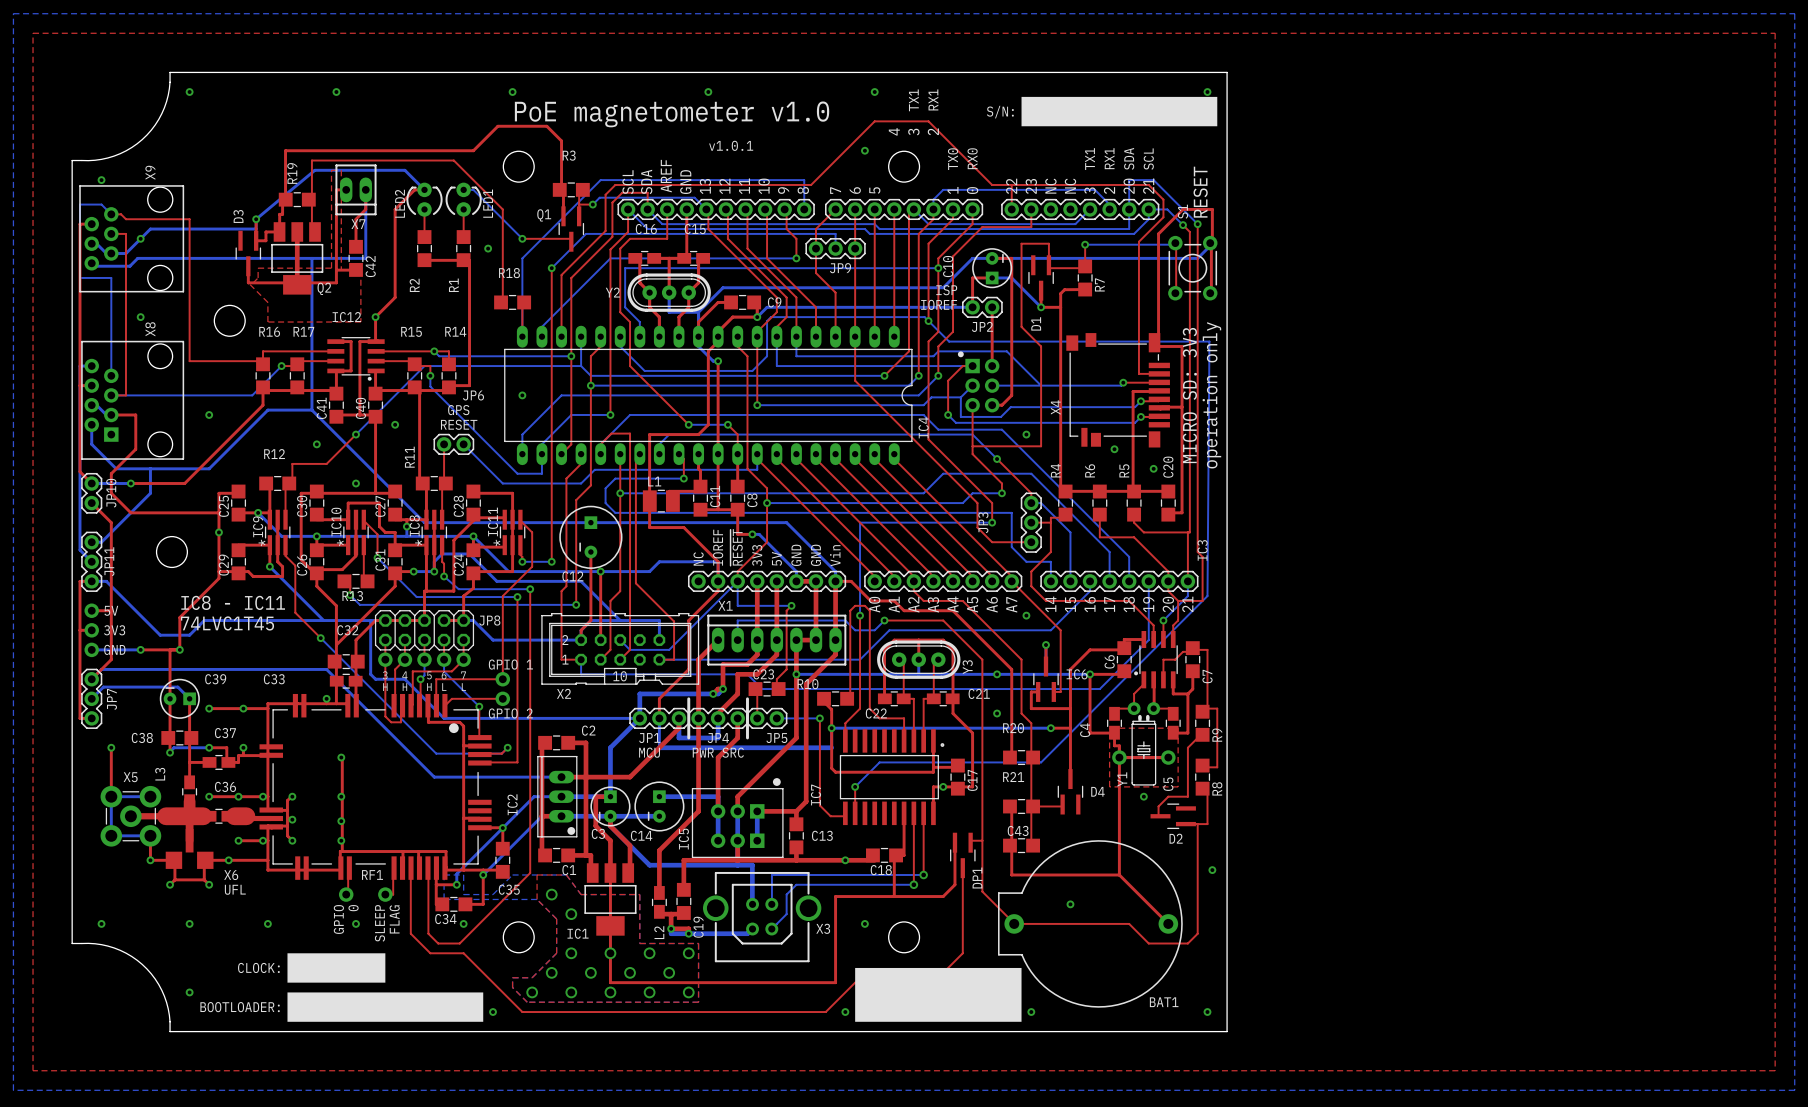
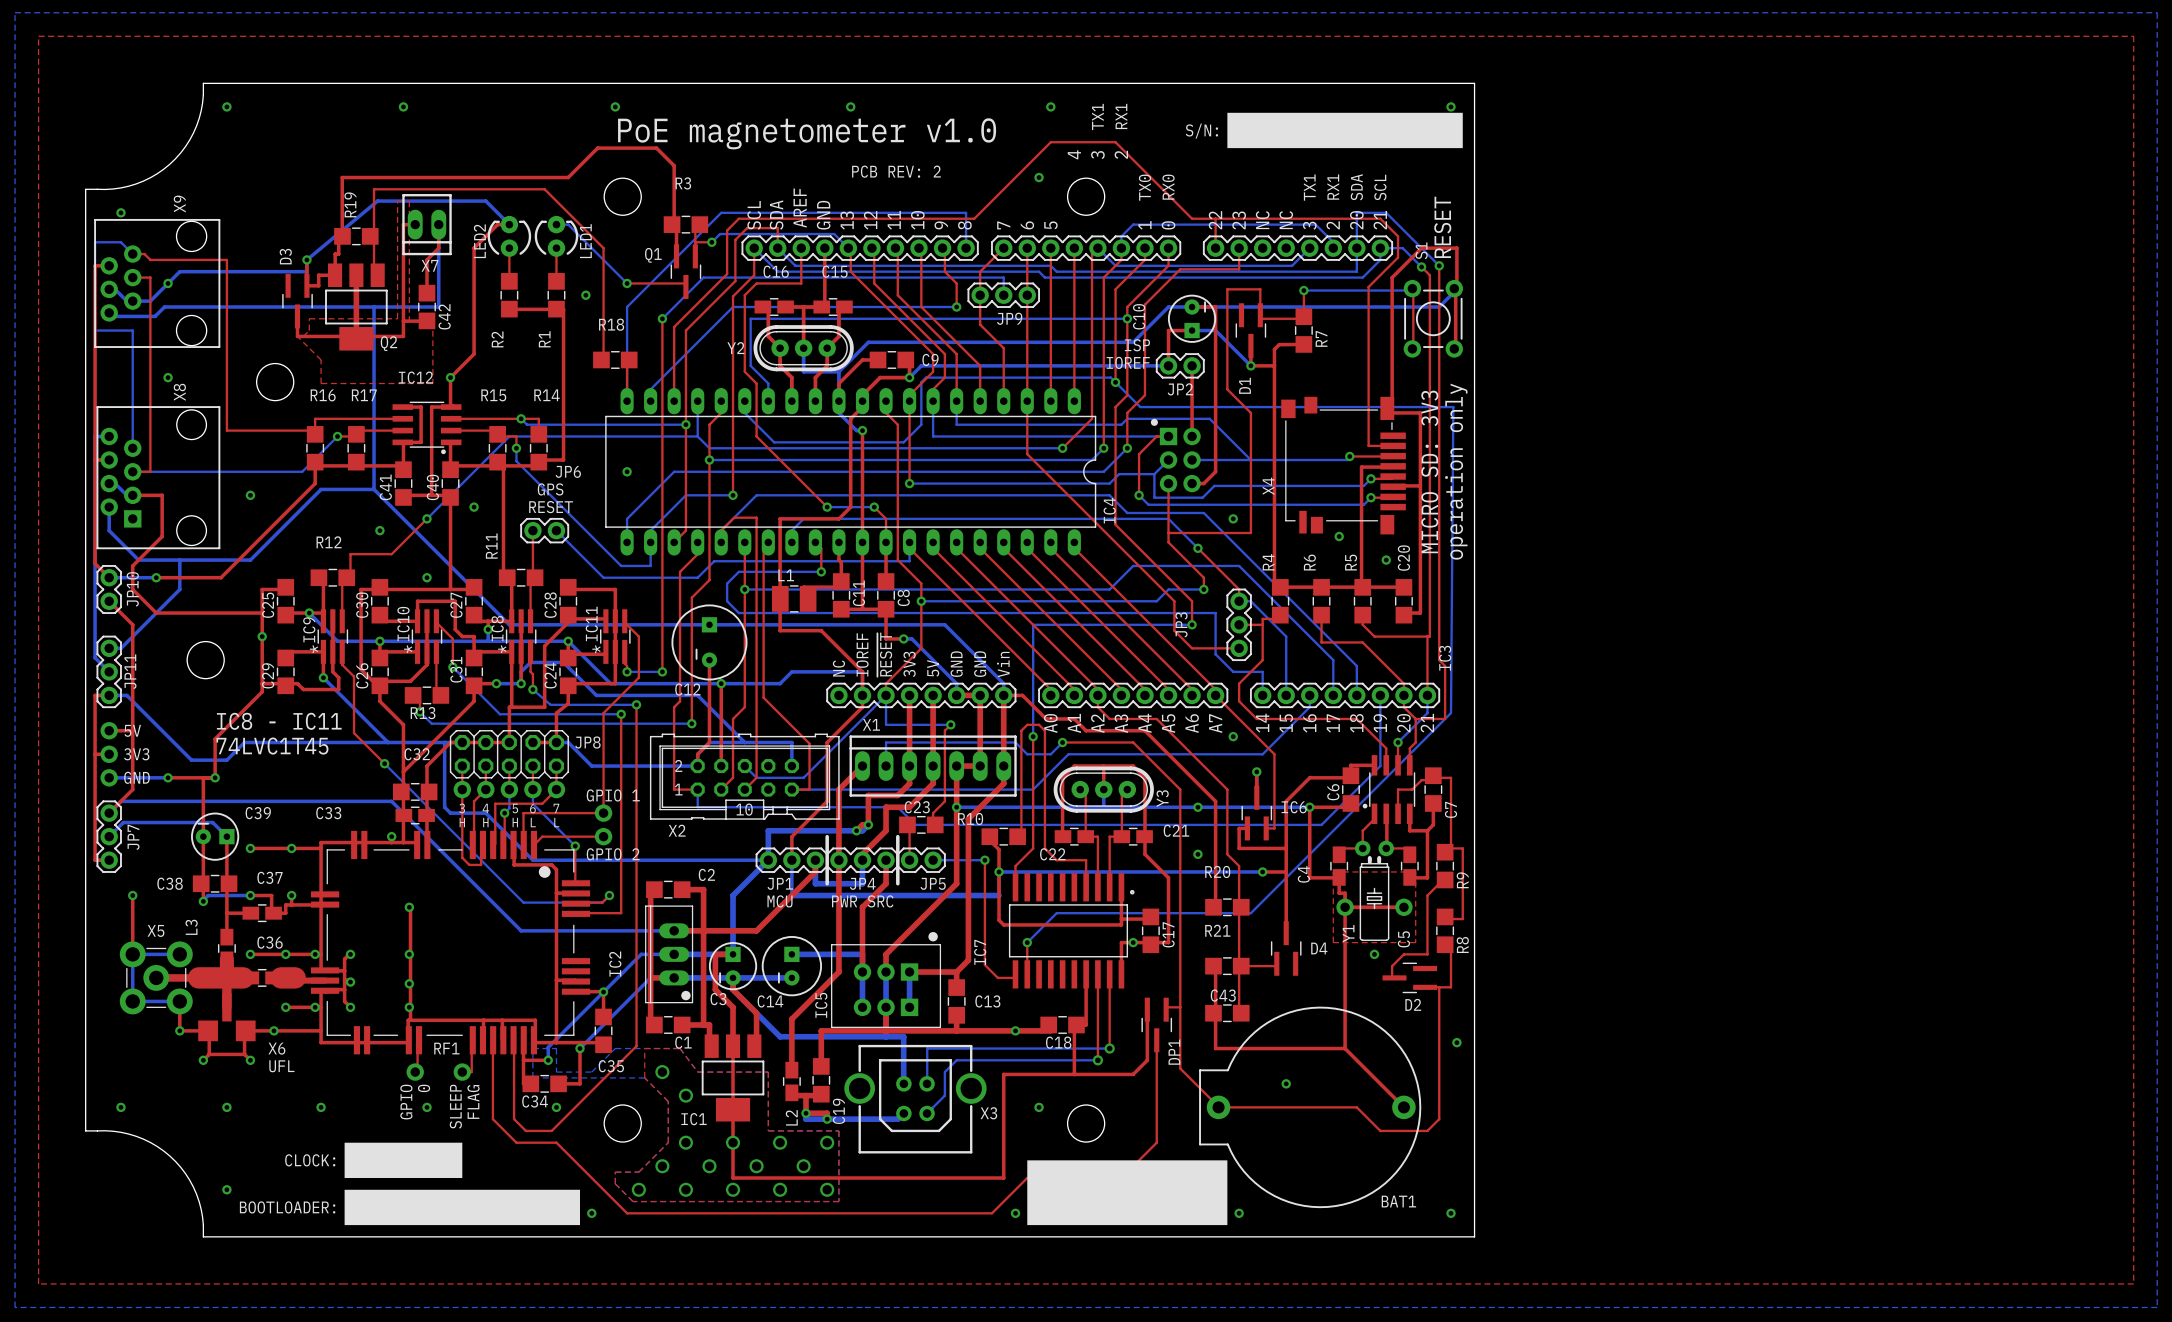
text: v1.0.1 (731, 145) -> PCB REV: 2 (896, 171)

